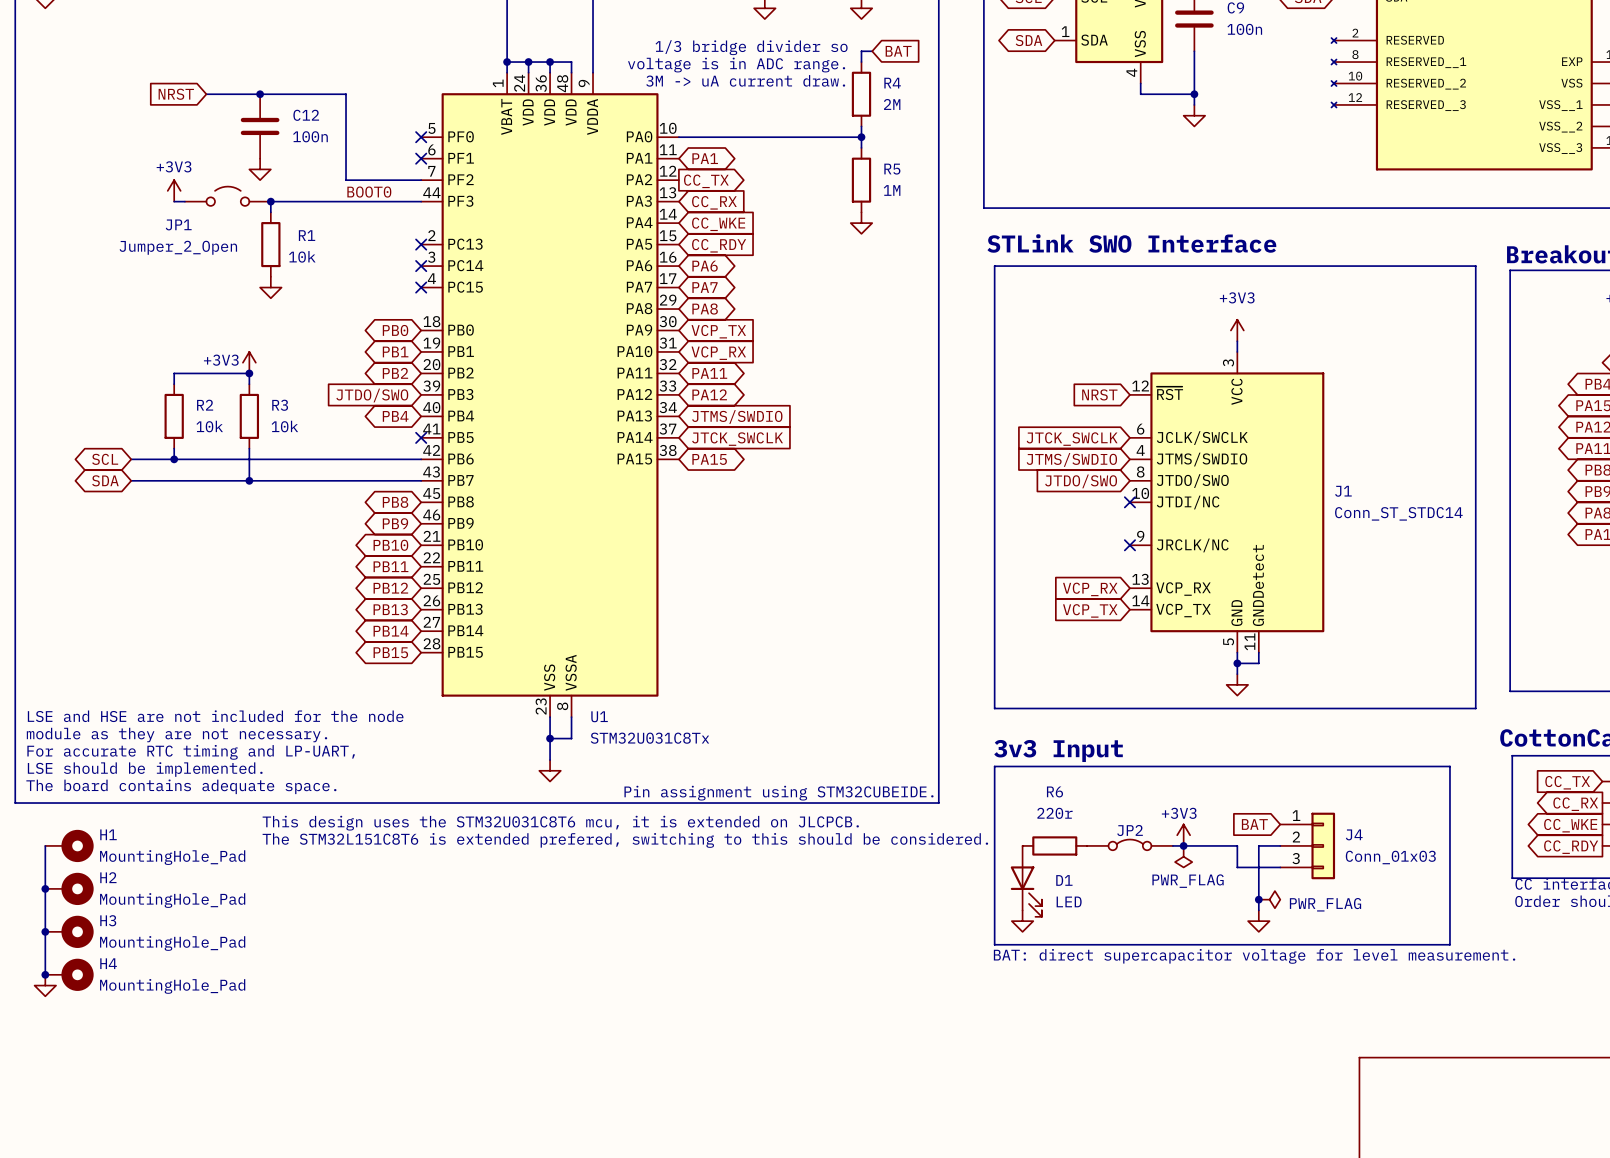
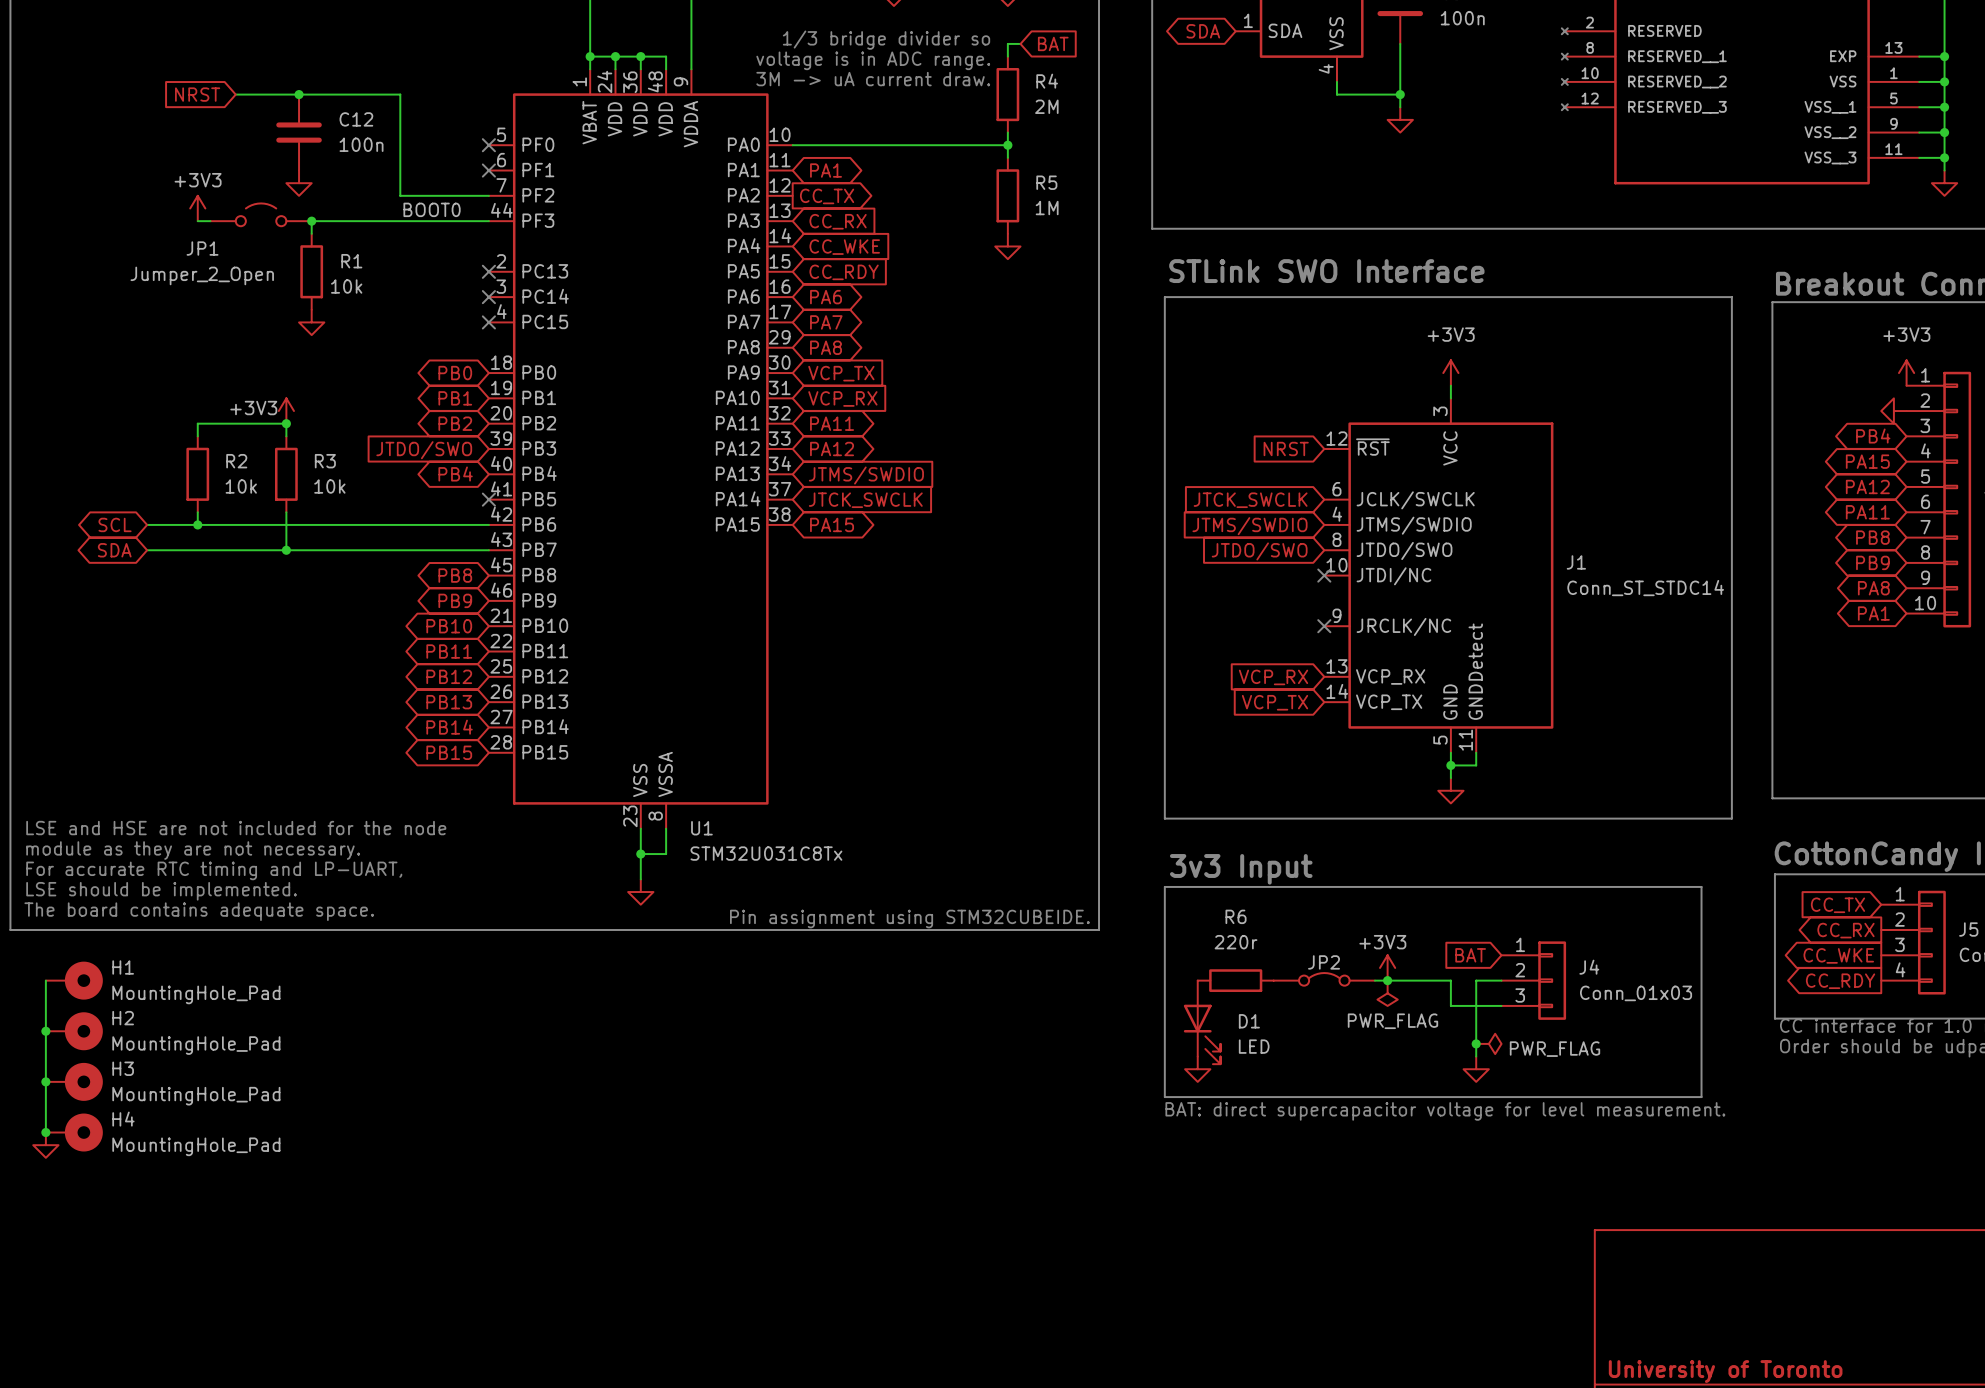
text: This design uses the STM32U031C8T6 mcu, it is extended on JLCPCB. (560, 823) -> none
text: The STM32L151C8T6 is extended prefered, switching to this should be considered. (625, 840) -> none

